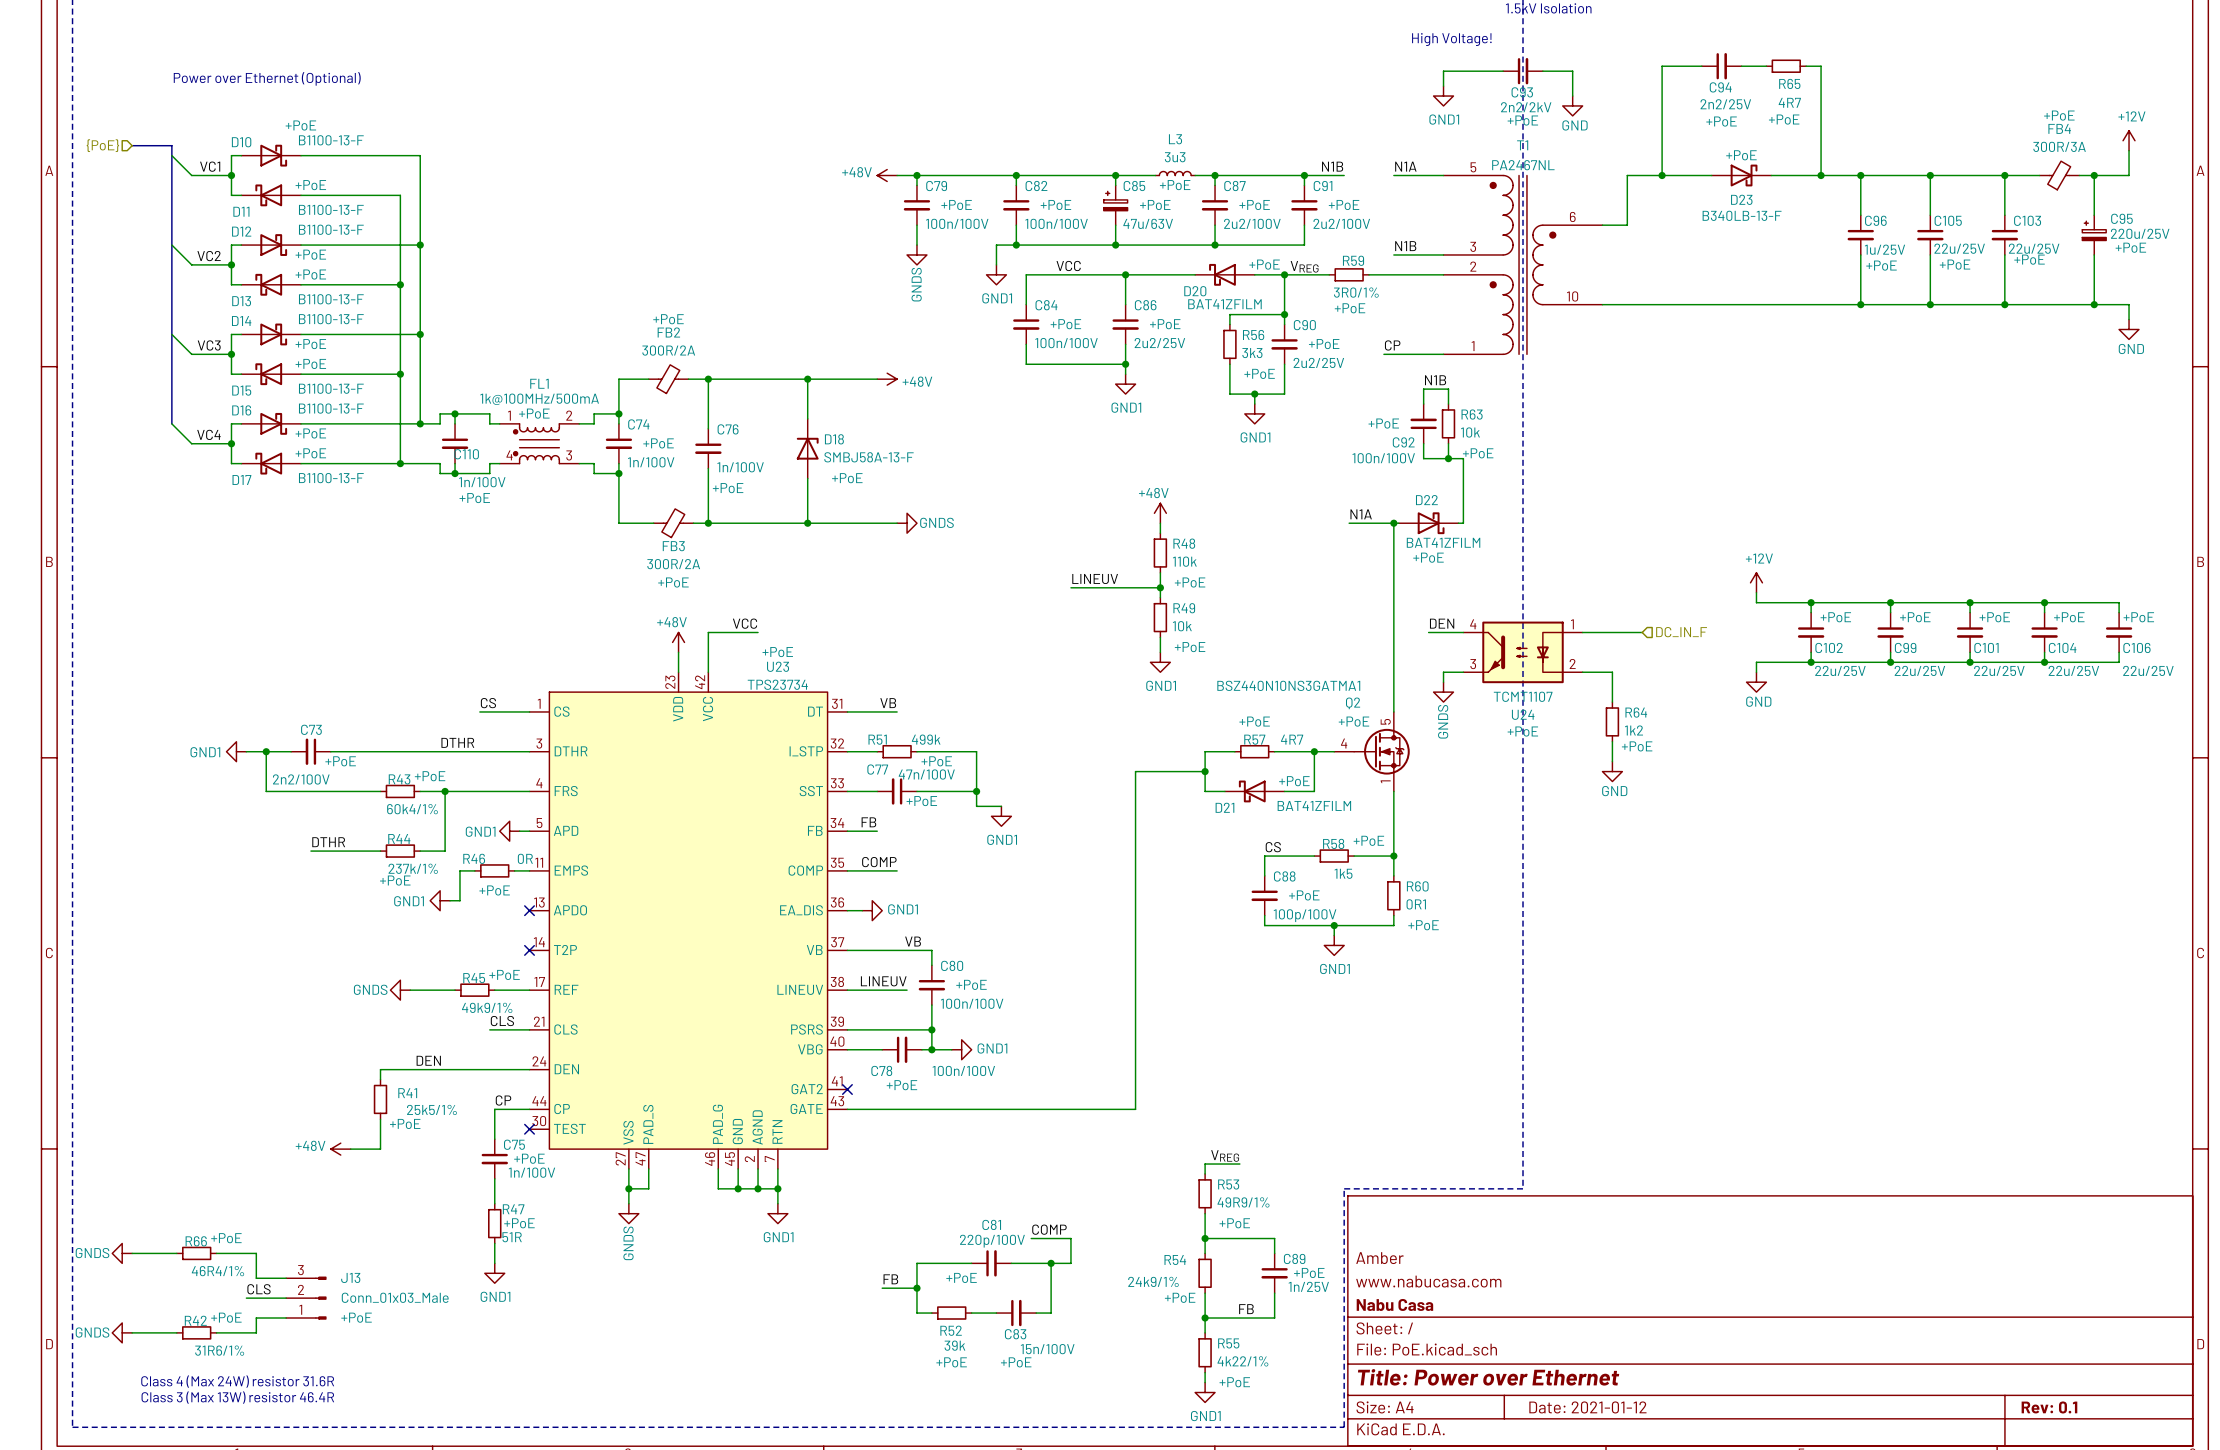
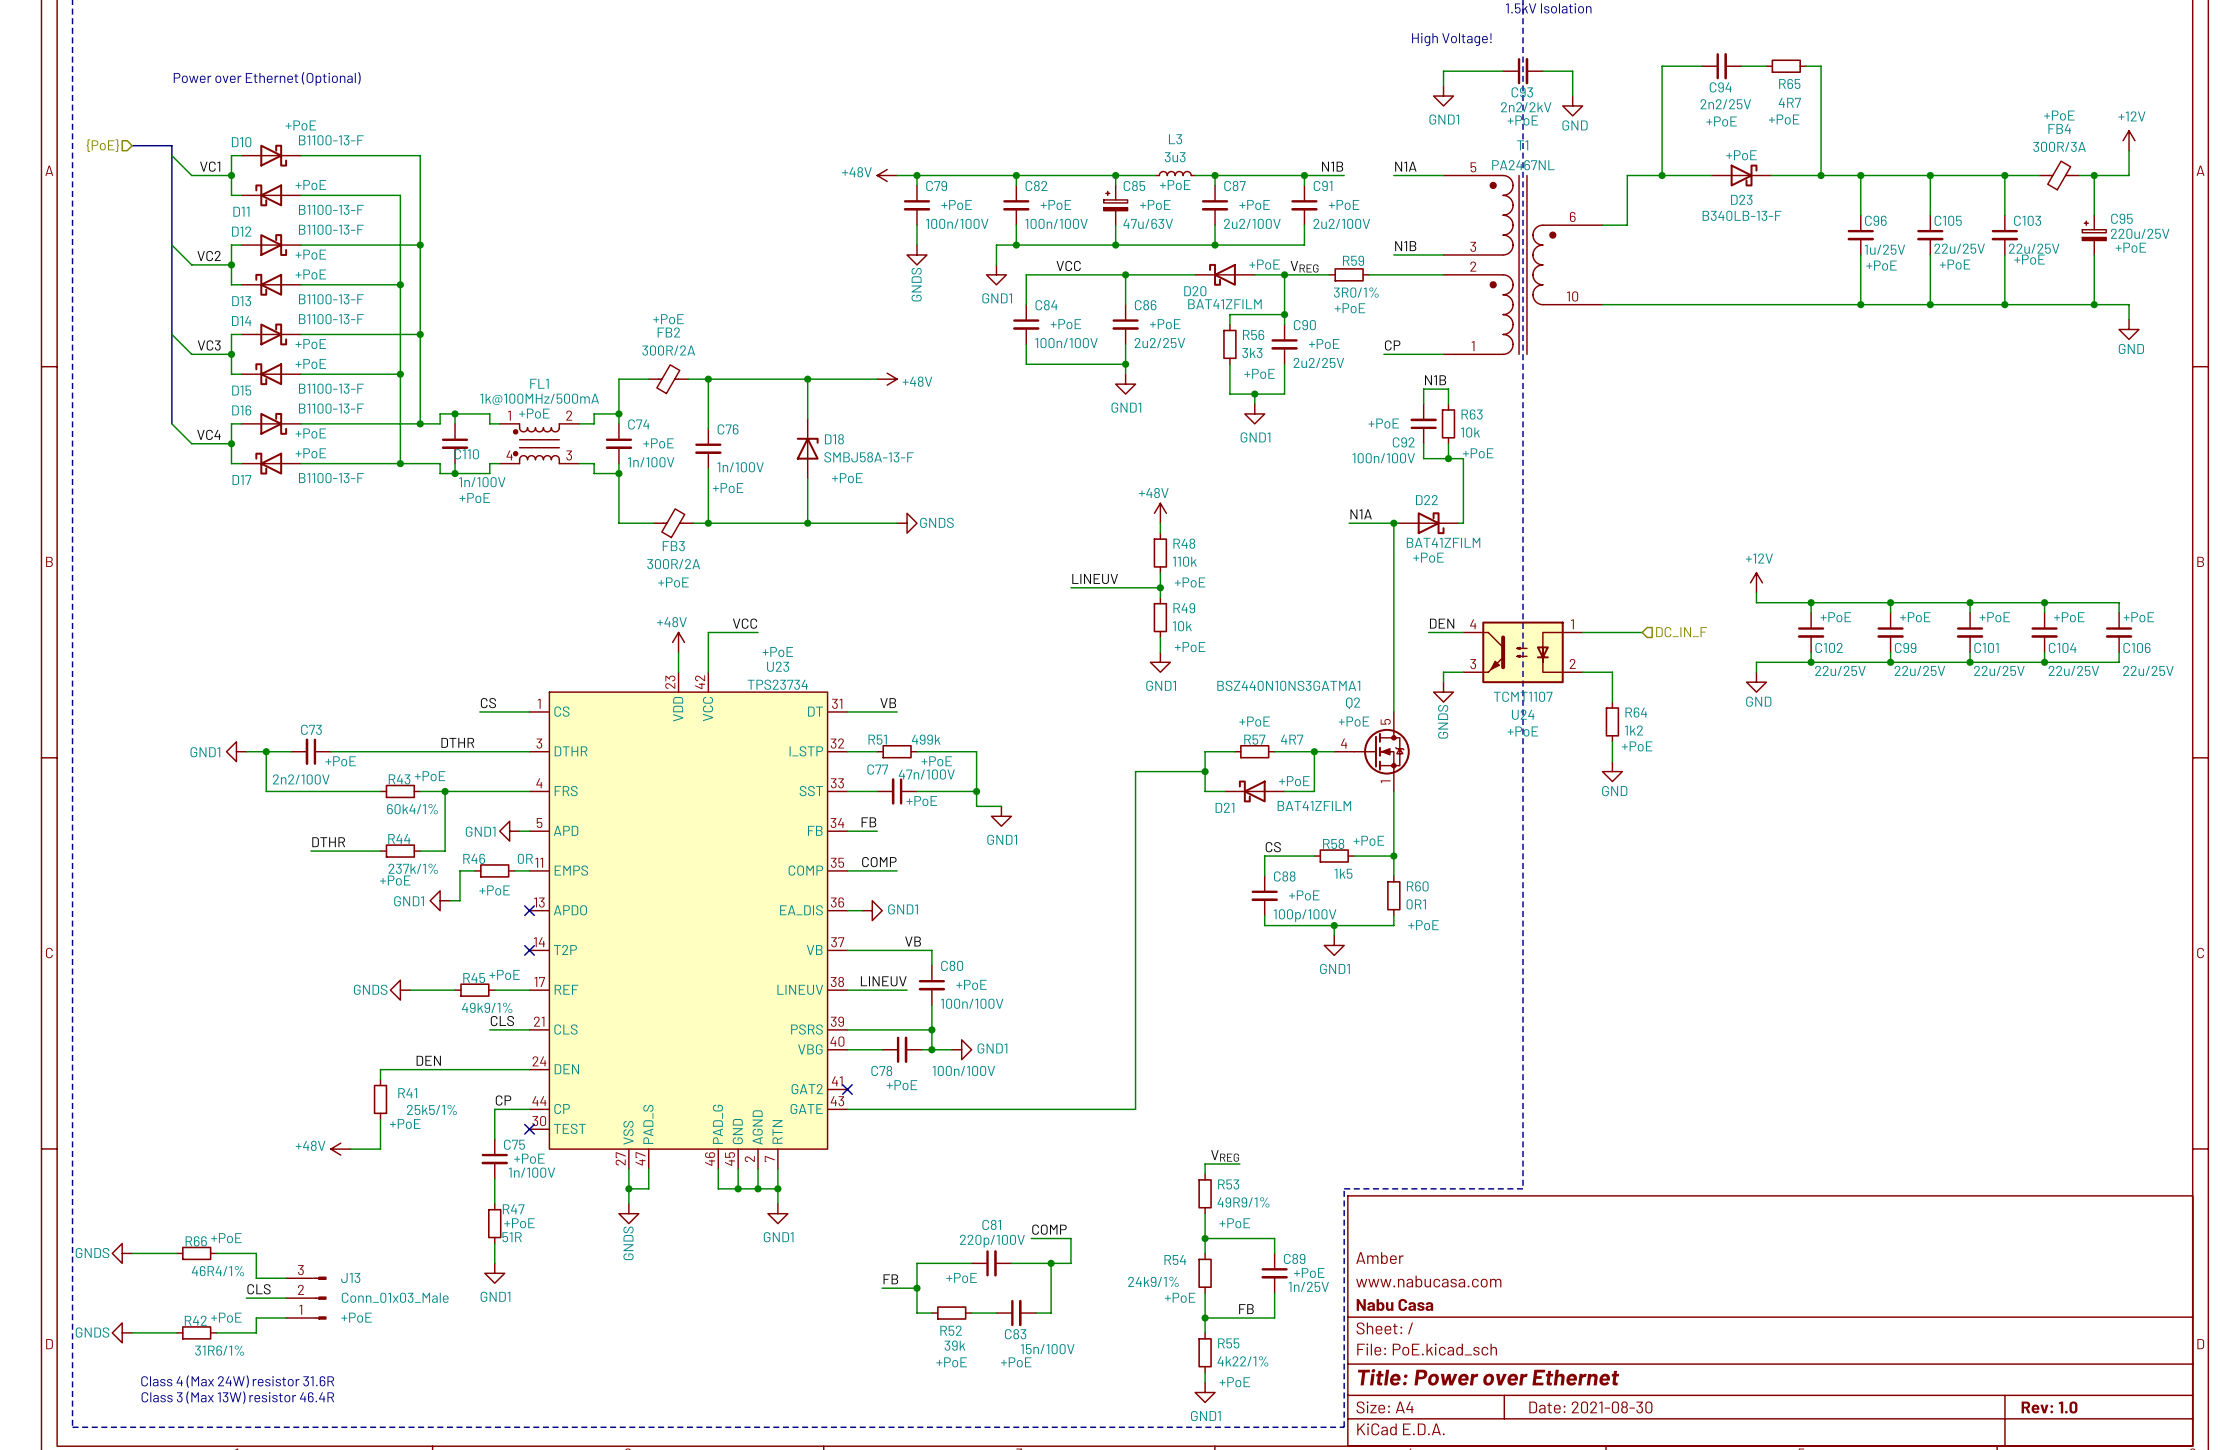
title block: Date: 2021-01-12 (1587, 1407) -> Date: 2021-08-30 (1590, 1407)
title block: Rev: 0.1 (2049, 1407) -> Rev: 1.0 (2049, 1407)

